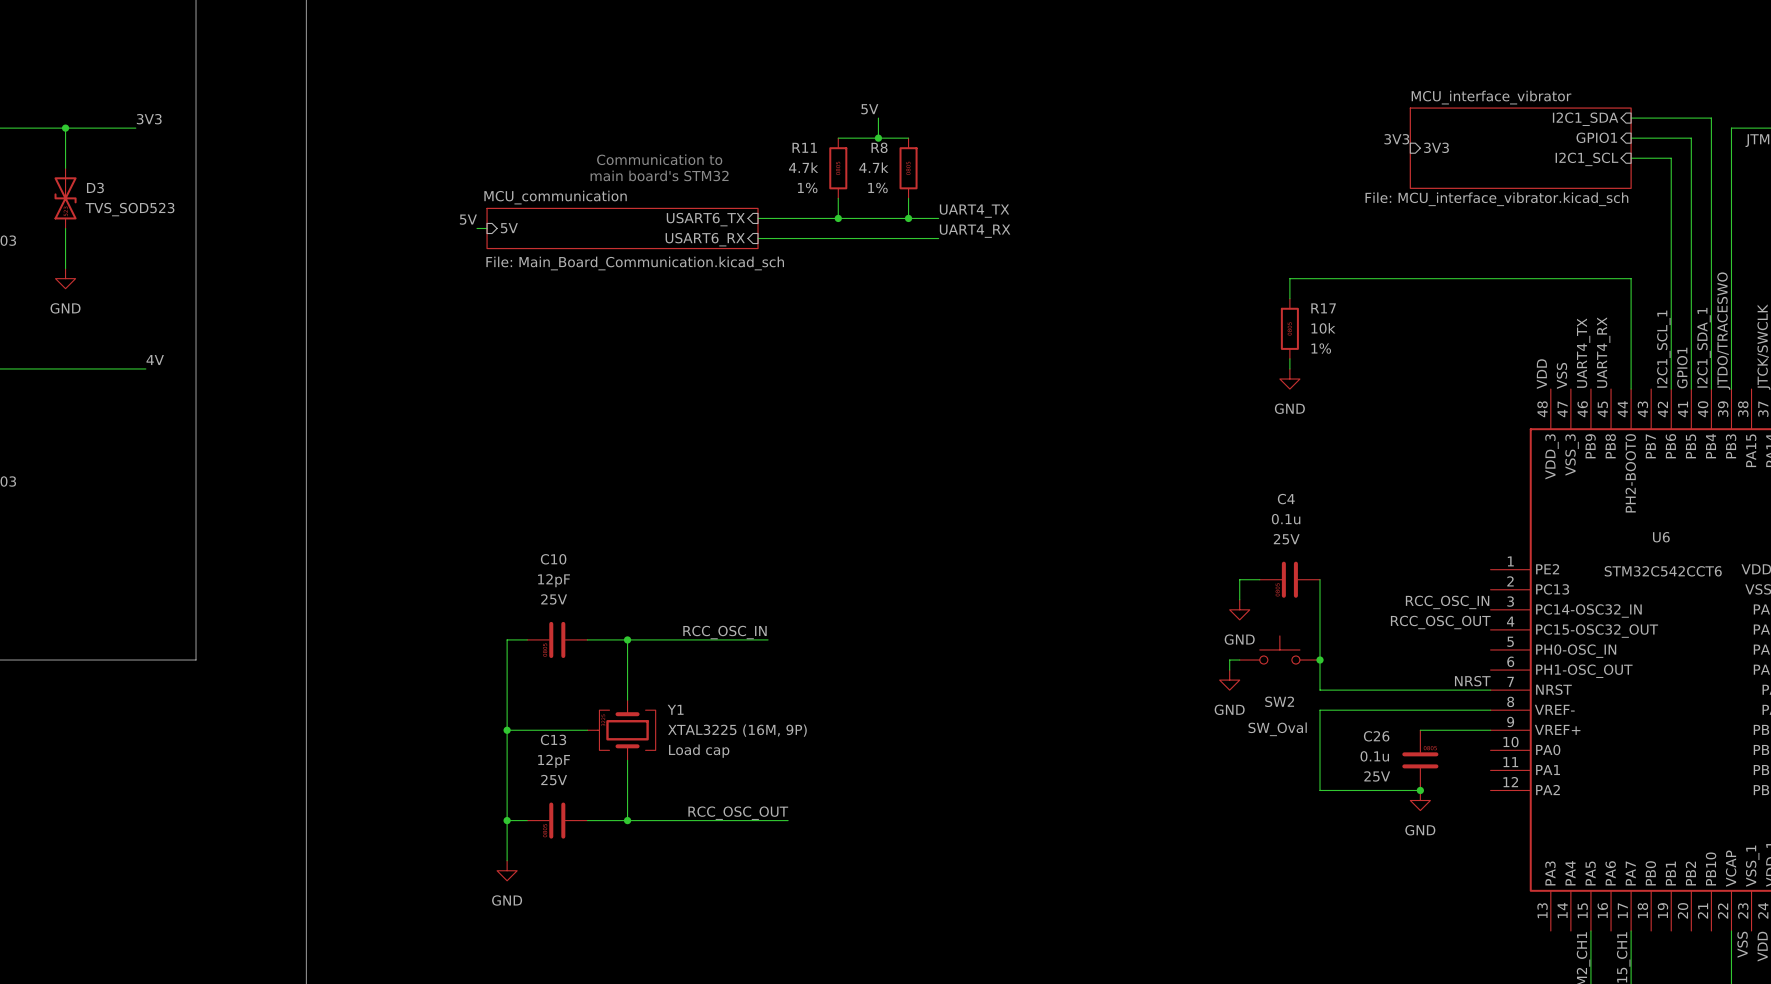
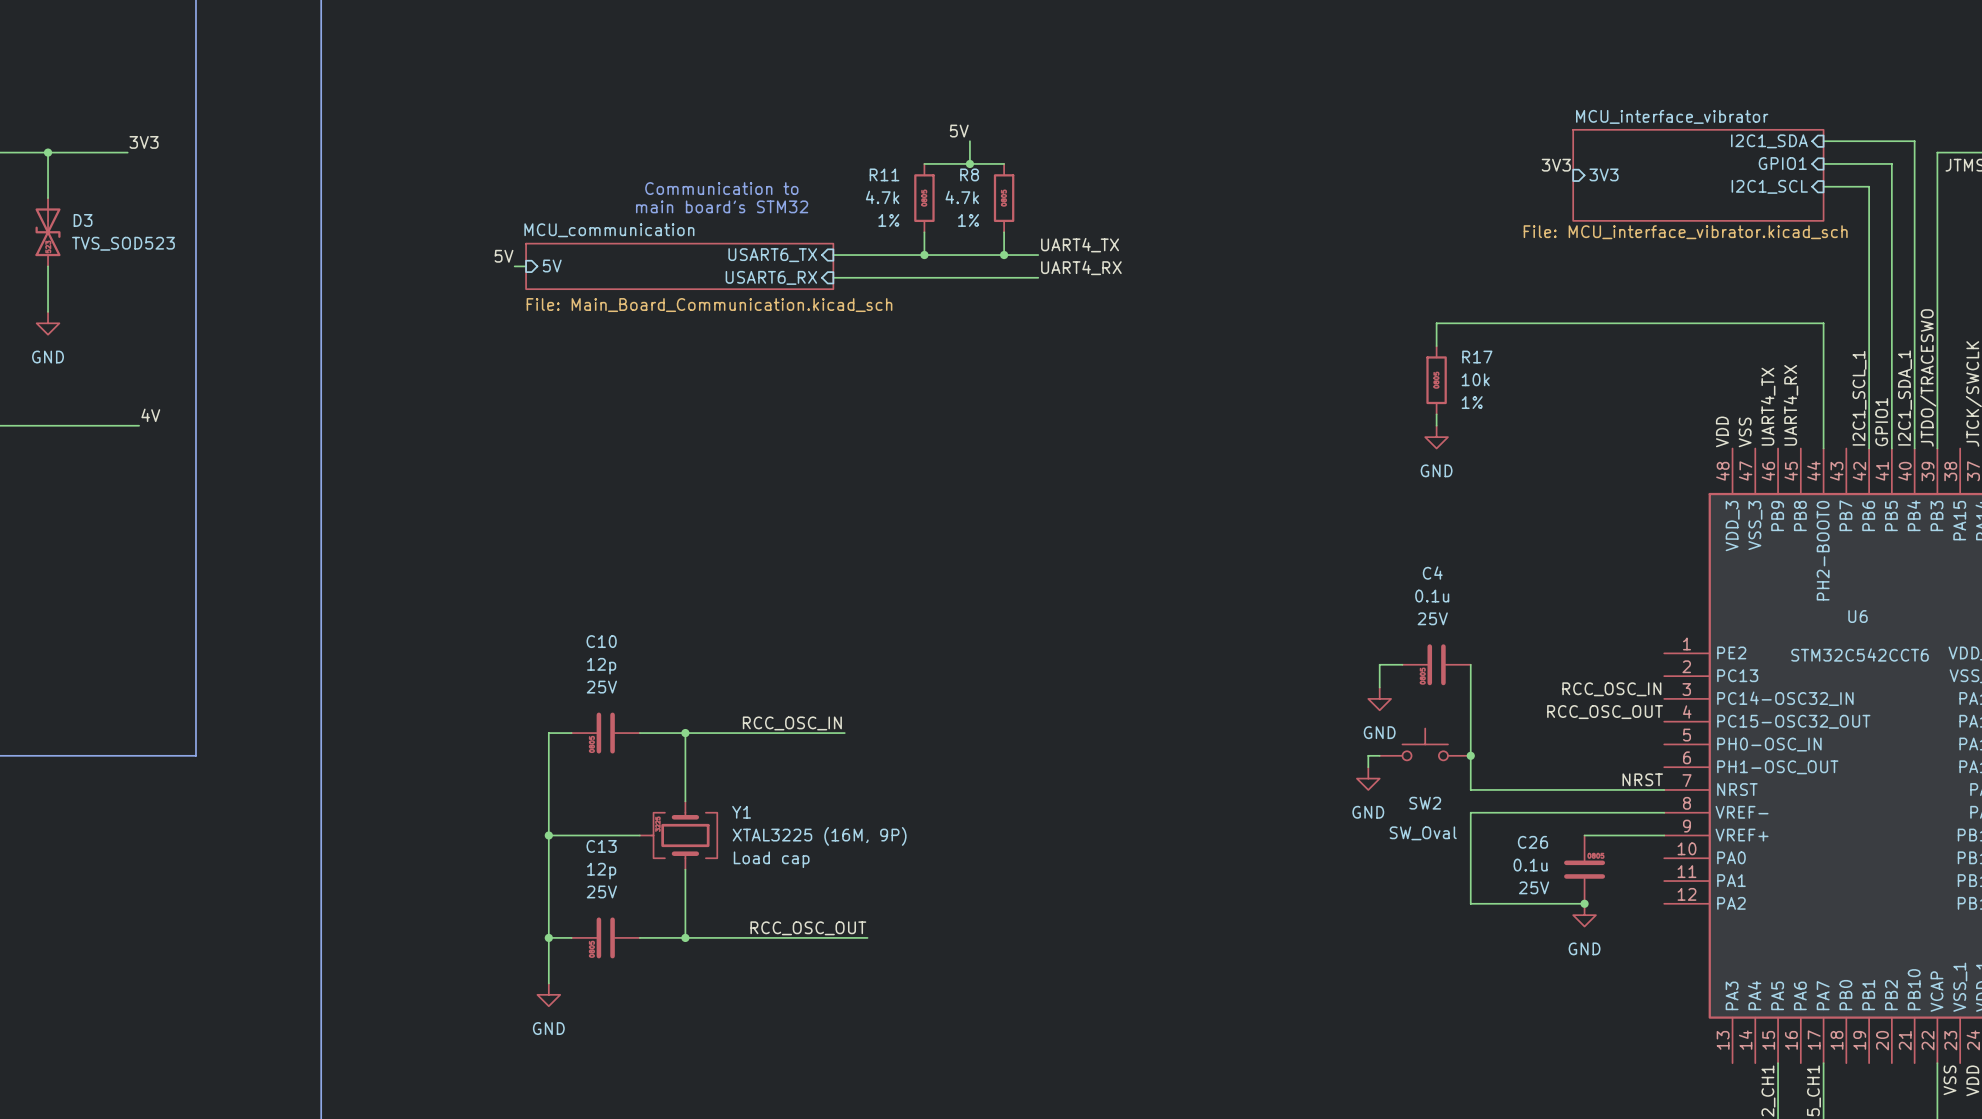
C10 value: 12pF (554, 580) -> 12p (601, 666)
C13 value: 12pF (554, 761) -> 12p (601, 871)

